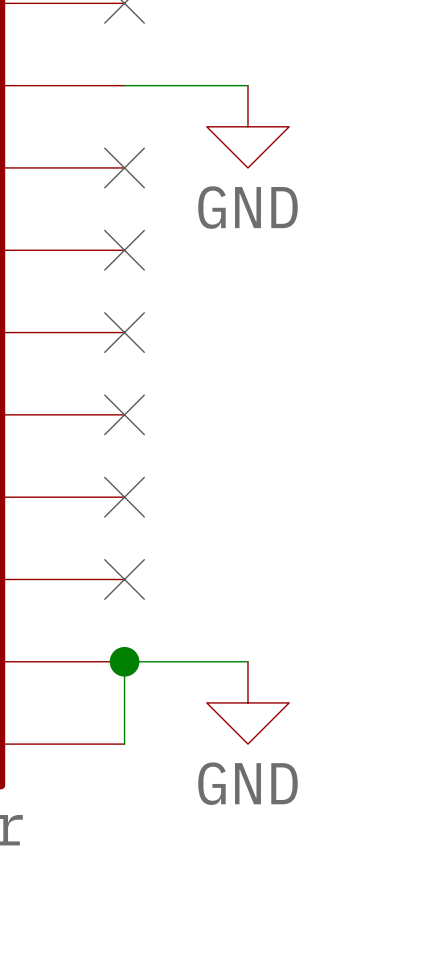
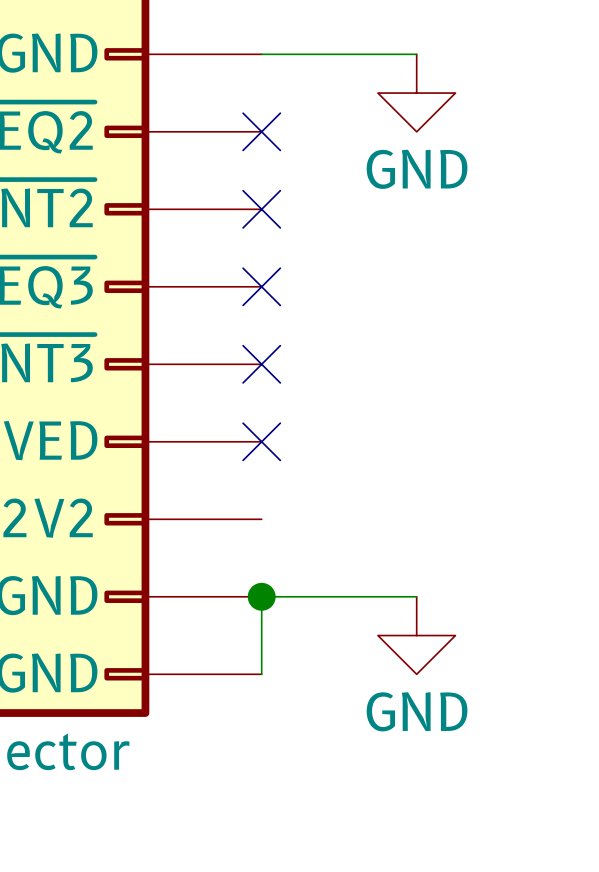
wire: none -> (377, 54) (416, 54)
power symbol position: GND (247, 126) -> GND (416, 93)
no-connect mark: (124, 579) -> none
wire: none -> (377, 596) (416, 596)
power symbol position: GND (247, 702) -> GND (416, 635)

